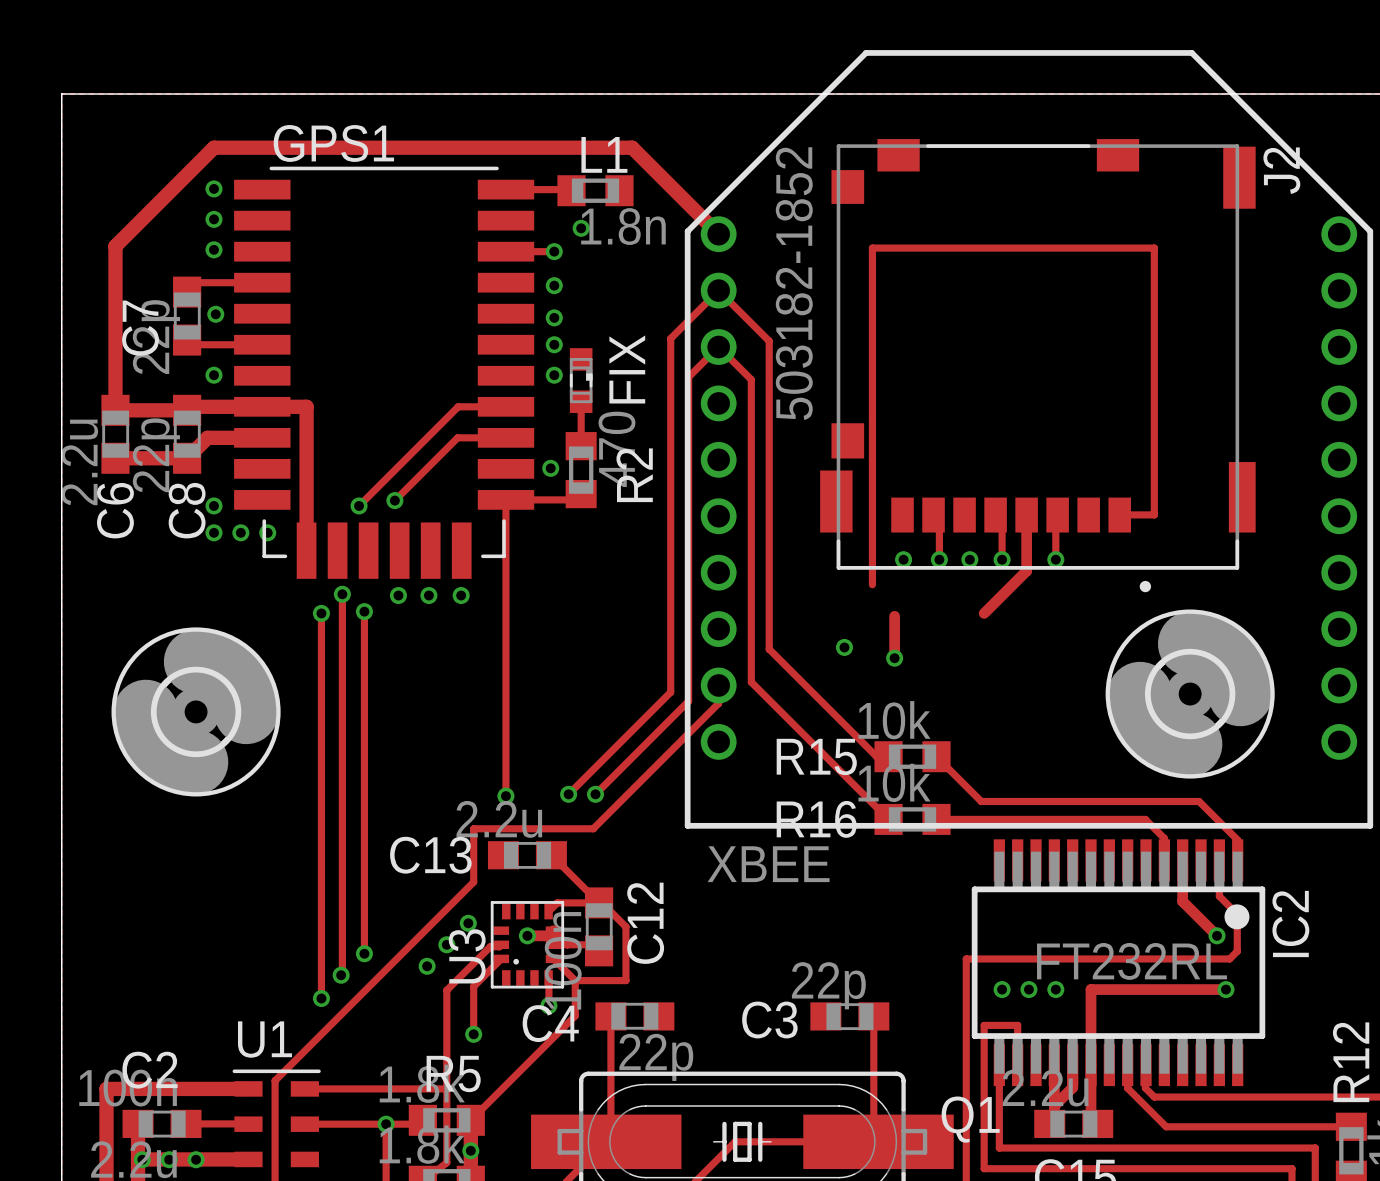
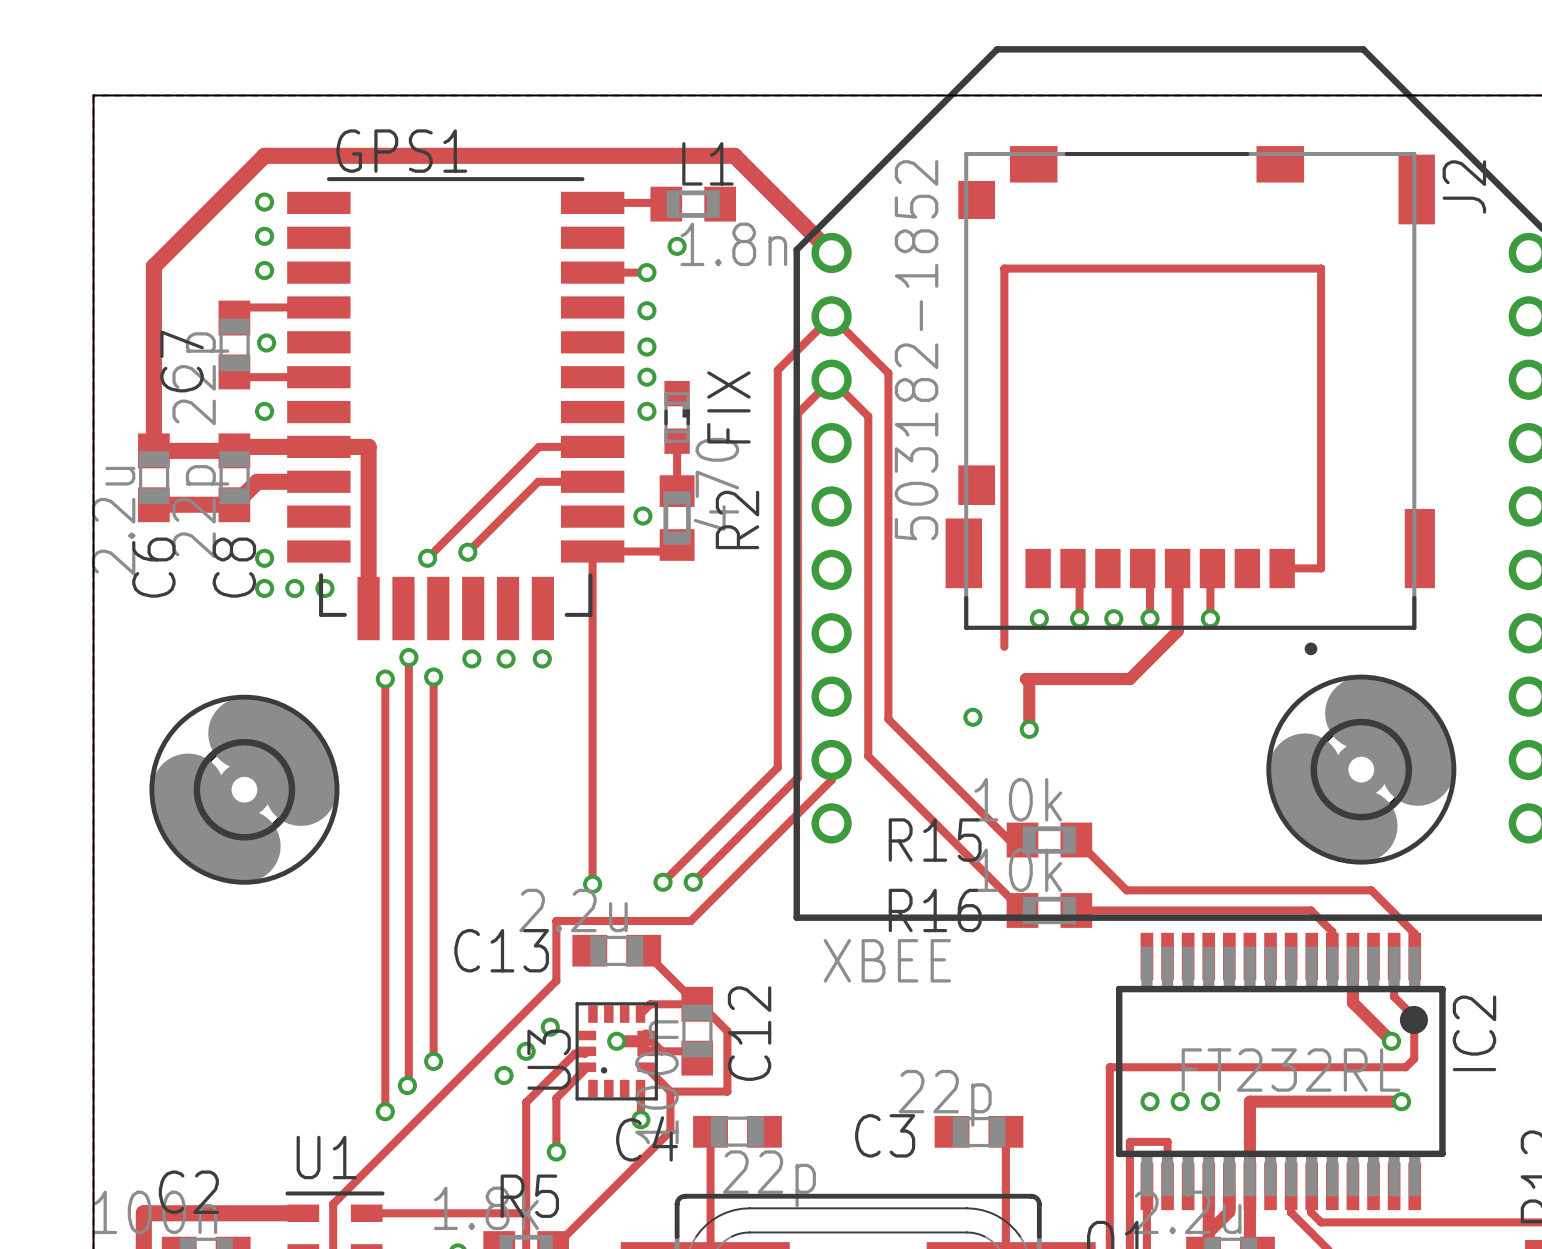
track: none -> (1129, 679) (1026, 679) (1029, 682)

